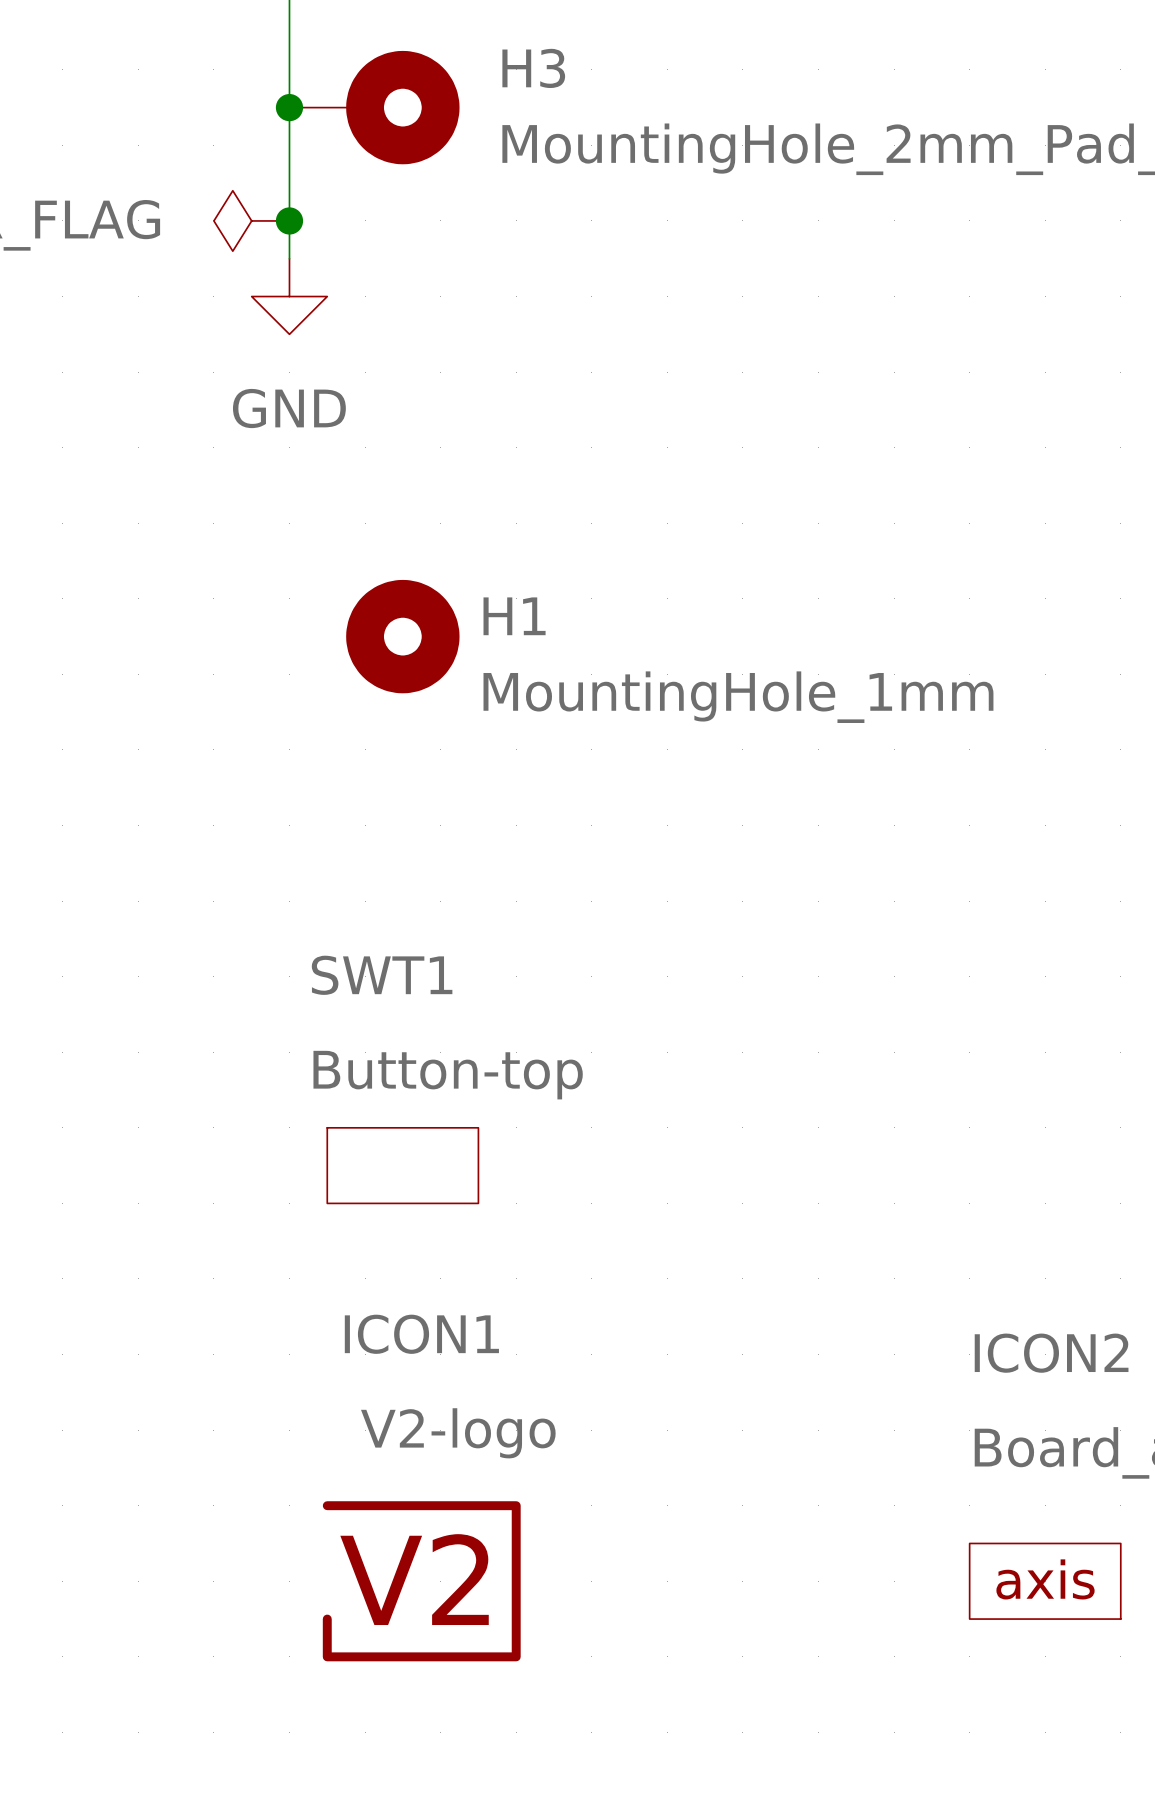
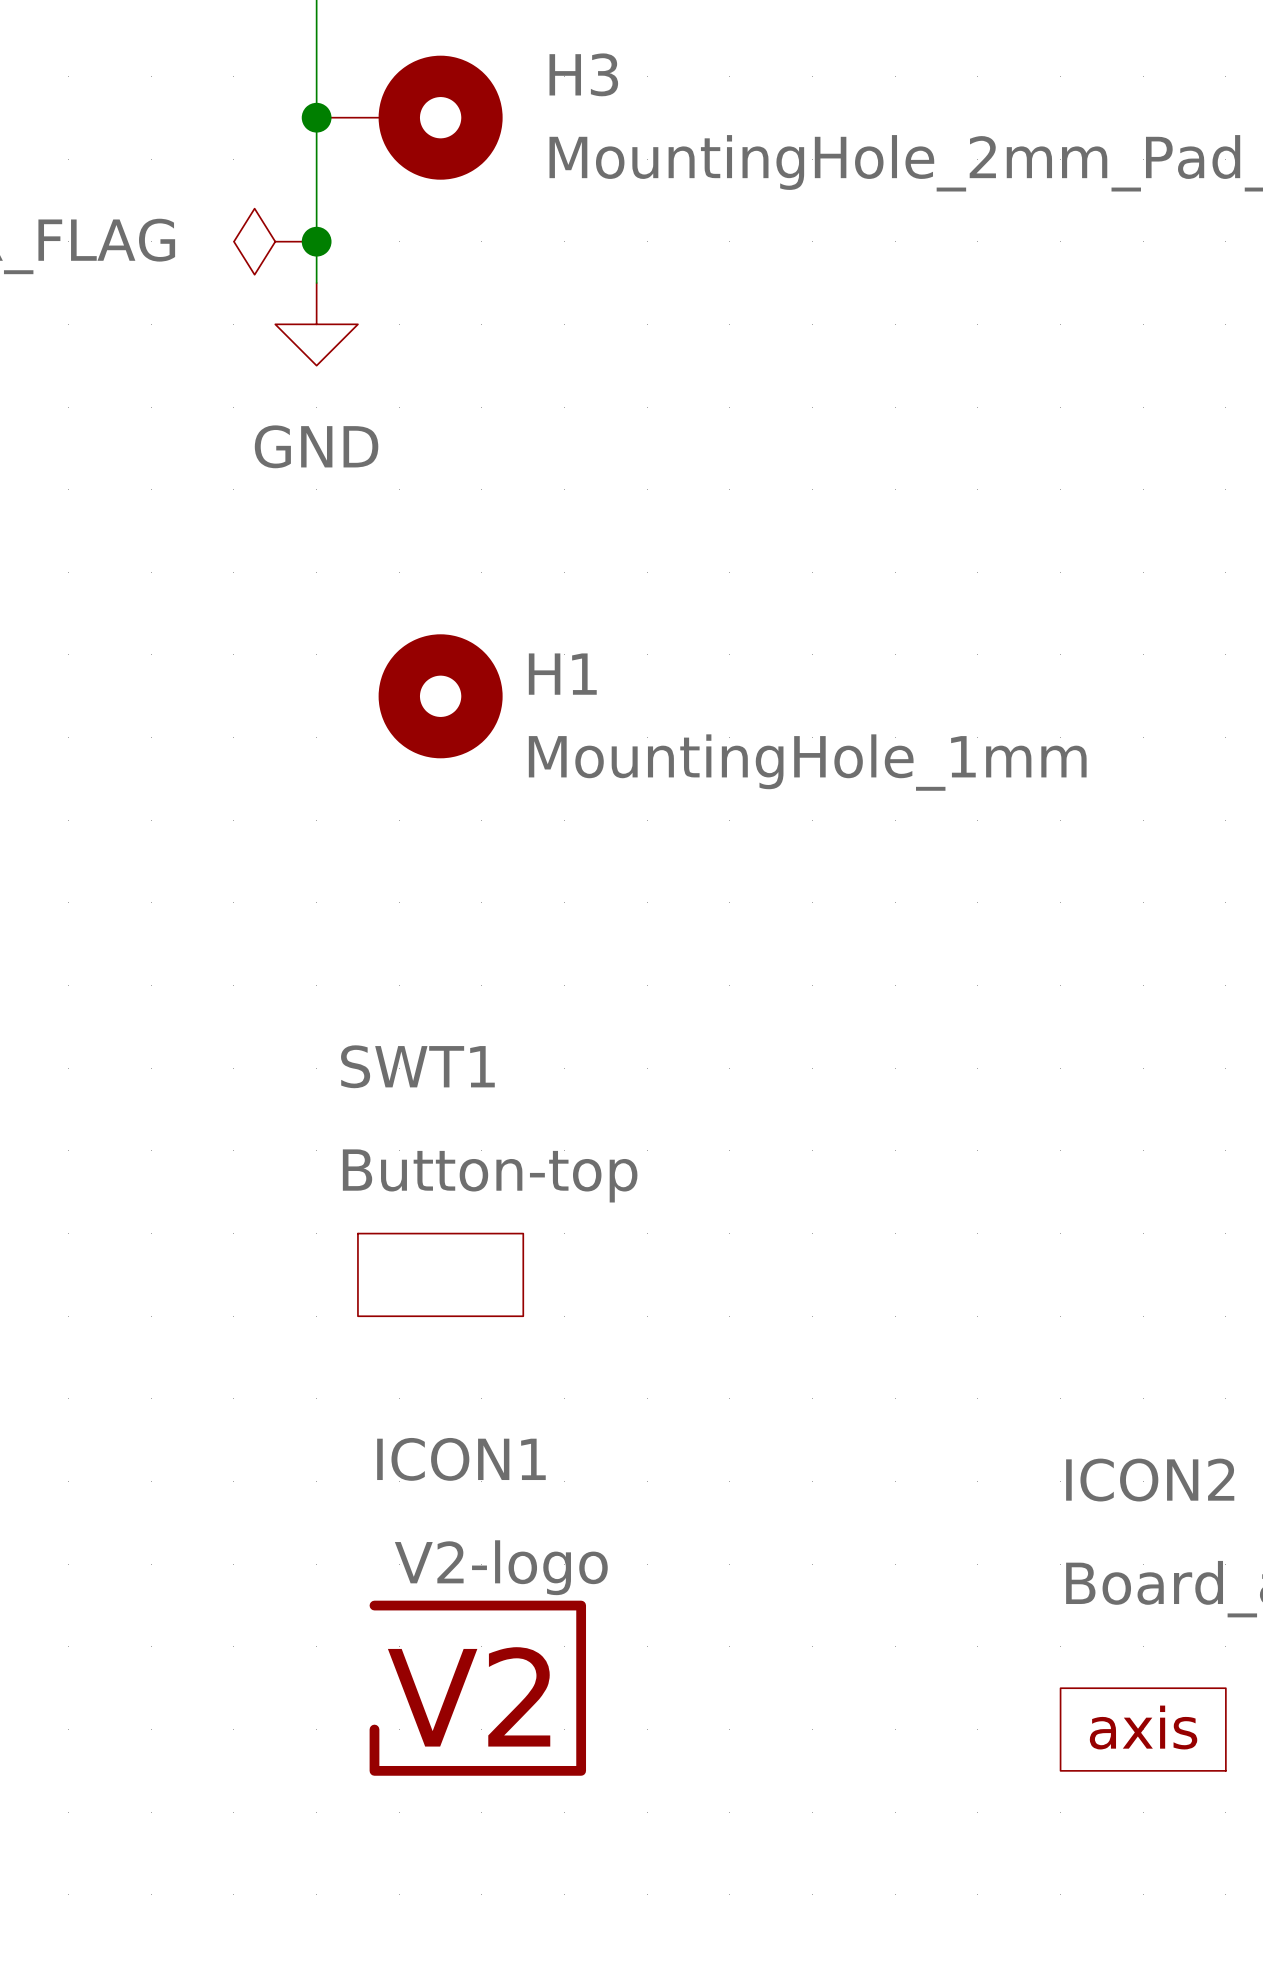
ICON1 text position: V2 (414, 1579) -> V2 (469, 1696)
ICON1 position: (421, 1581) -> (477, 1688)

